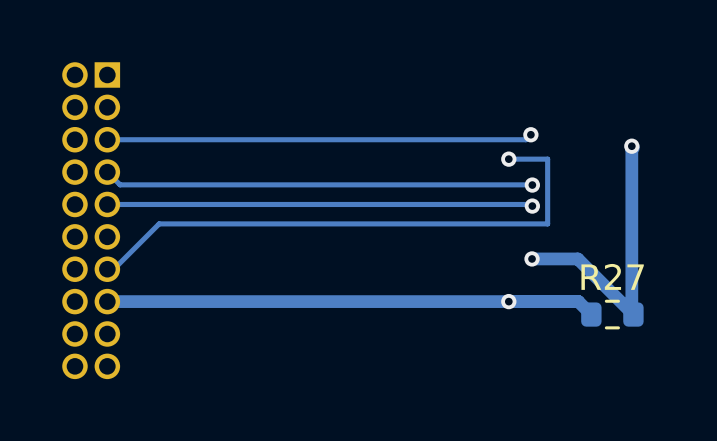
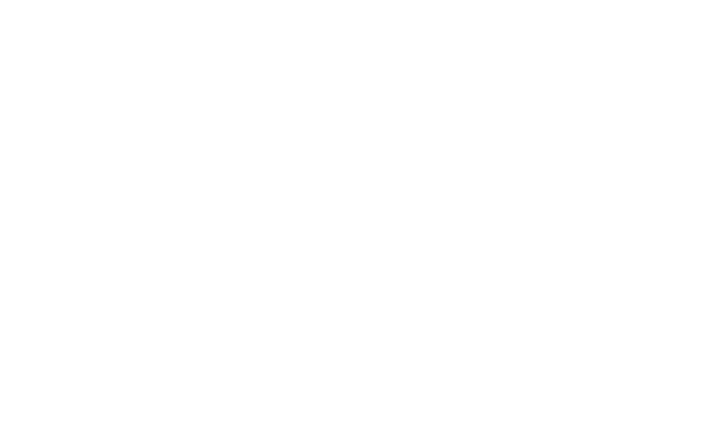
track: (530, 134) (525, 139) (107, 139) -> none
via: (530, 134) -> none
track: (631, 146) (633, 147) (631, 149) (631, 312) -> none
via: (631, 146) -> none
track: (508, 159) (547, 159) (547, 223) (159, 223) (113, 269) (107, 269) -> none
via: (508, 159) -> none
track: (107, 172) (120, 184) (532, 184) -> none
via: (532, 185) -> none
track: (107, 204) (530, 204) (532, 206) -> none
via: (532, 206) -> none
part: (91, 220) -> none
track: (532, 258) (577, 258) (633, 314) -> none
via: (532, 258) -> none
track: (107, 301) (578, 301) (592, 316) -> none
via: (508, 301) -> none
R27: (612, 314) -> none

